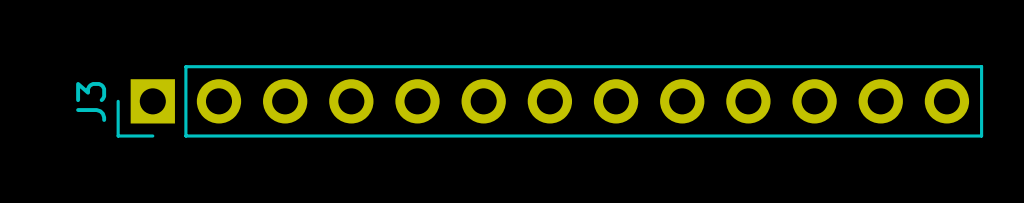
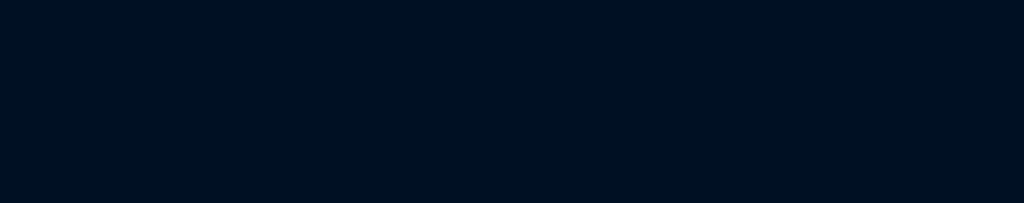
J3: (549, 101) -> none

